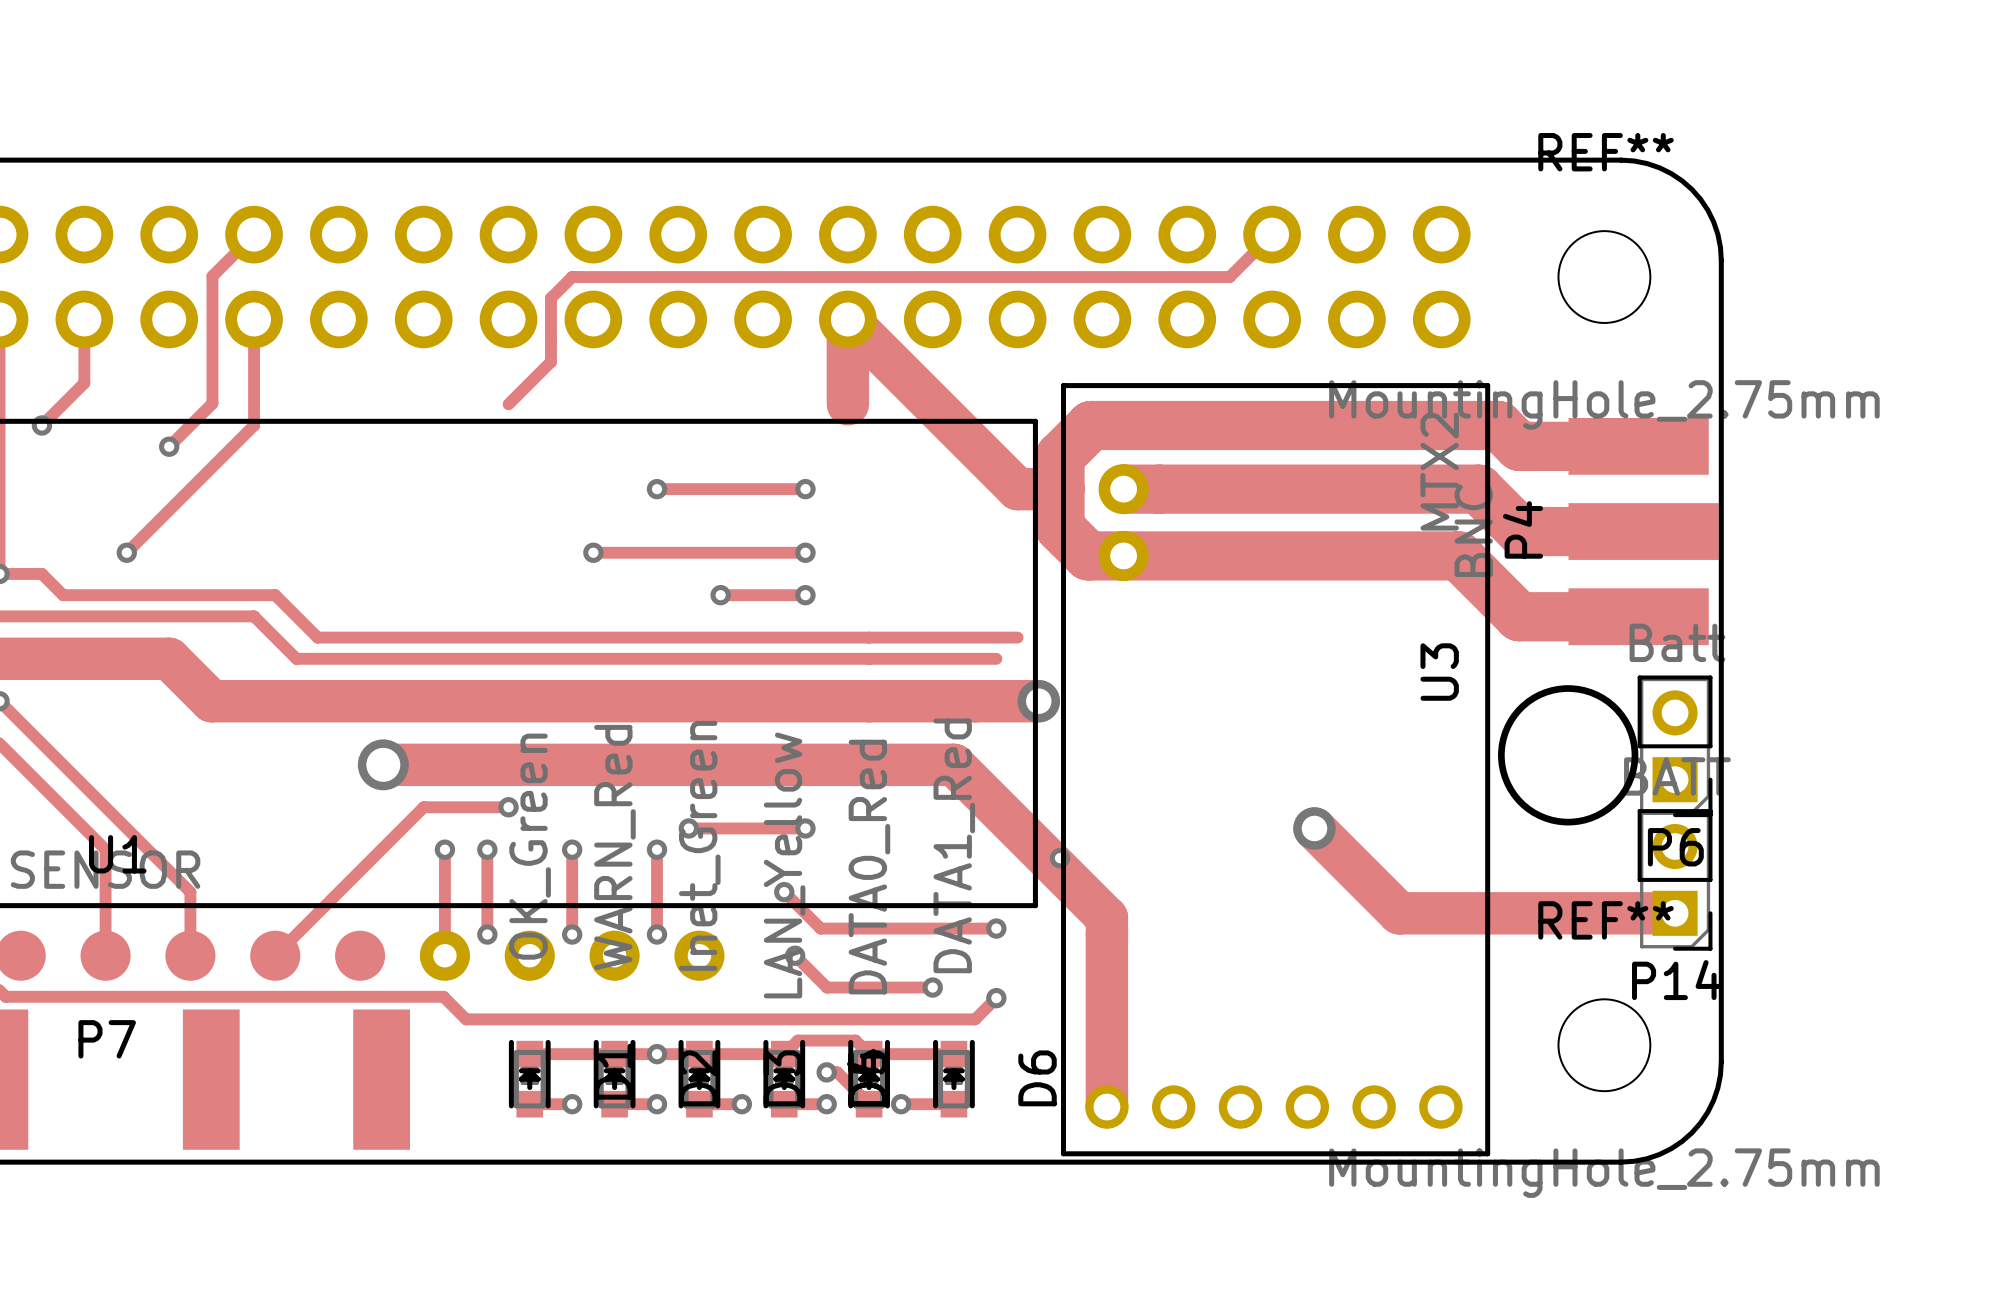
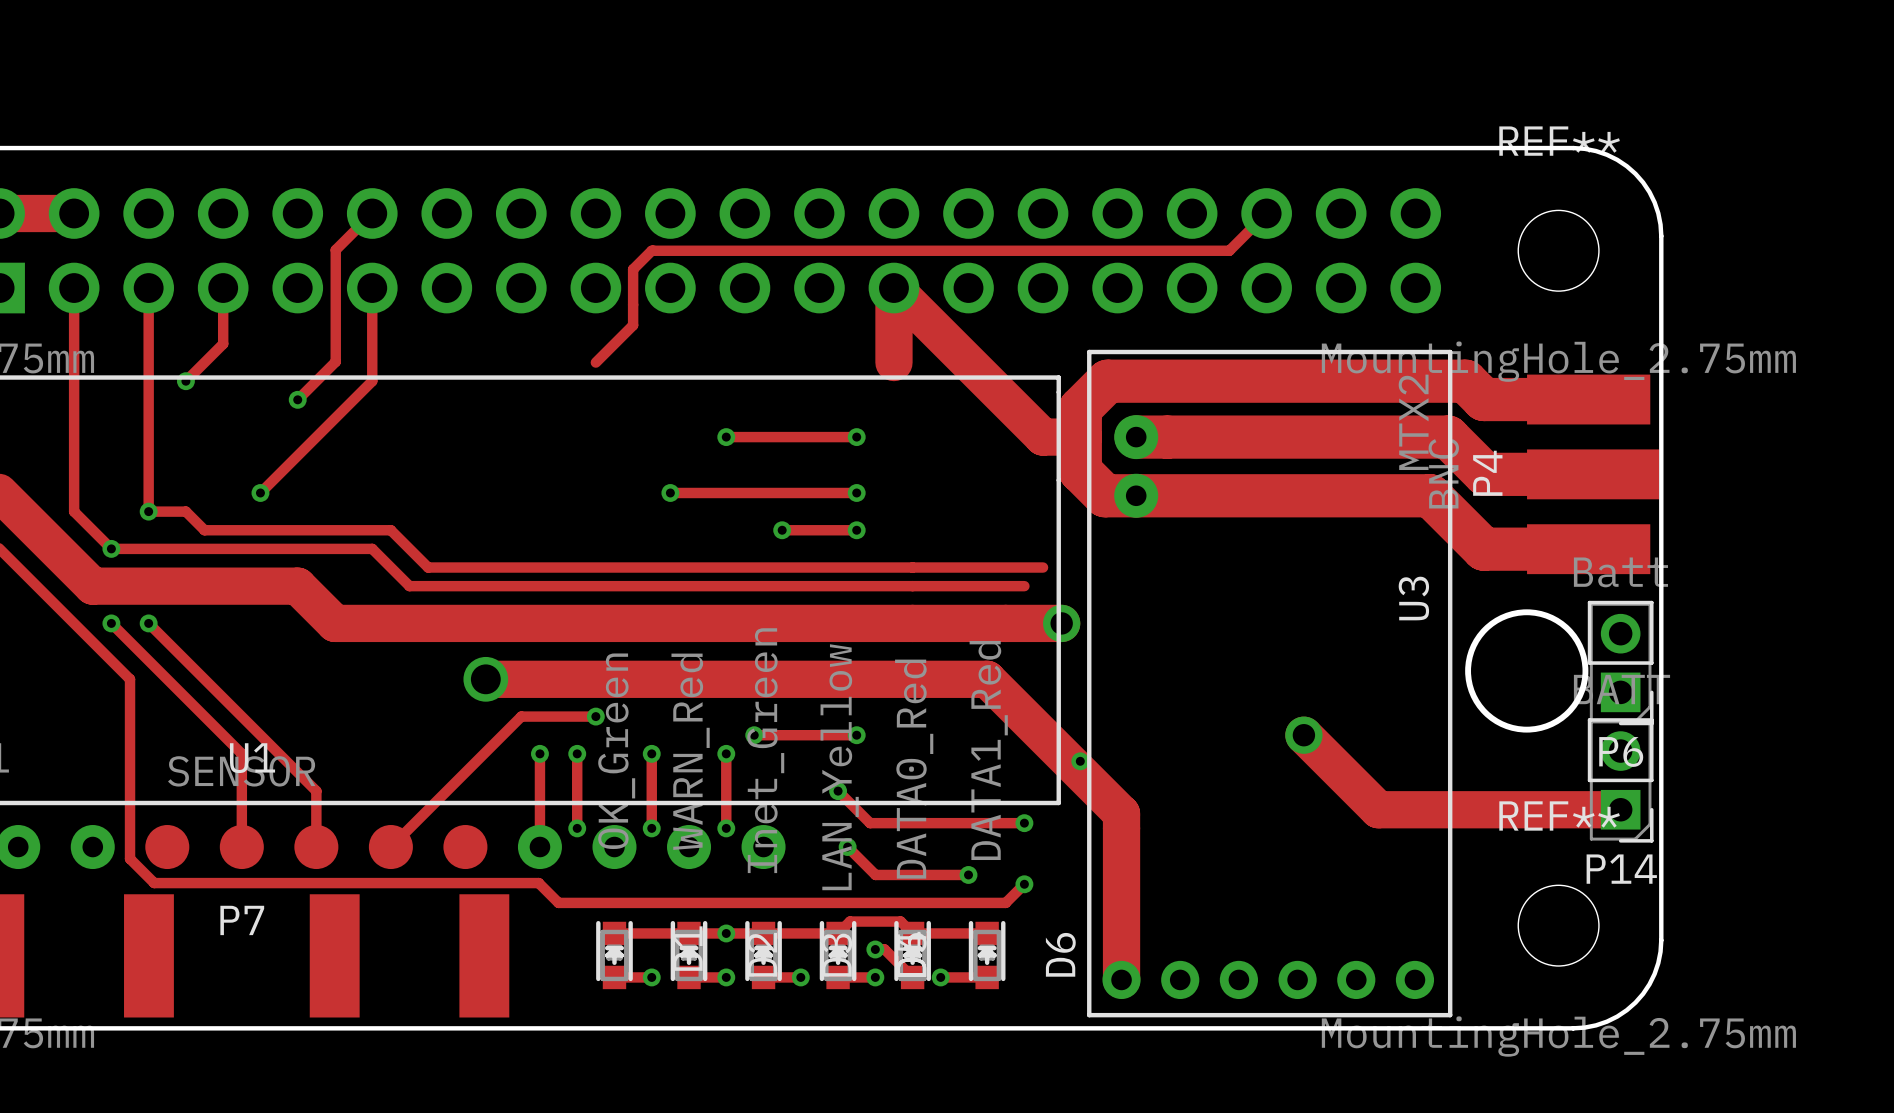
U3 footprint: [1060, 383, 1491, 1157] -> [1087, 349, 1453, 1018]

